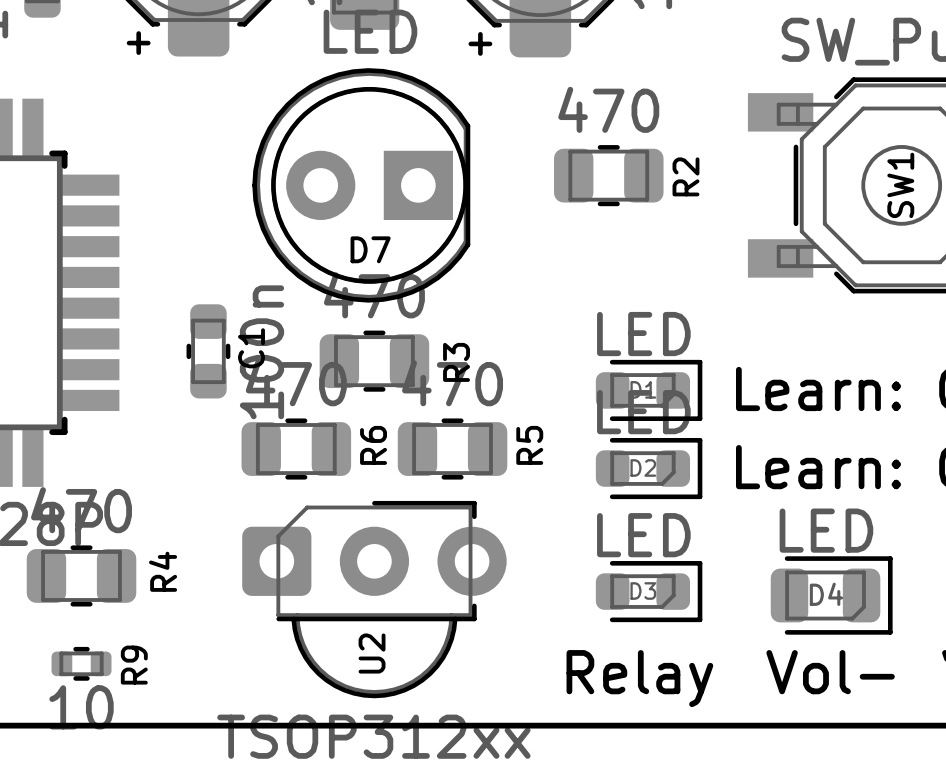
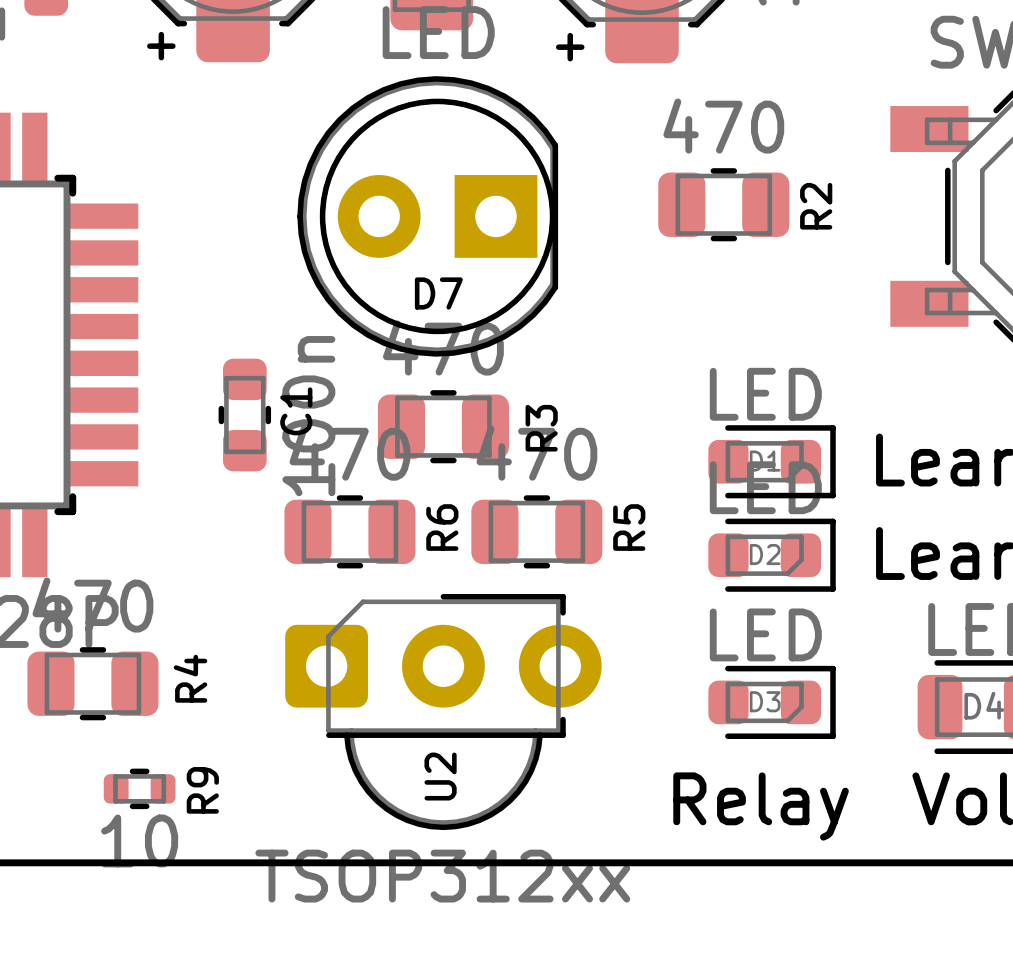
R9 position: (81, 663) -> (139, 788)

